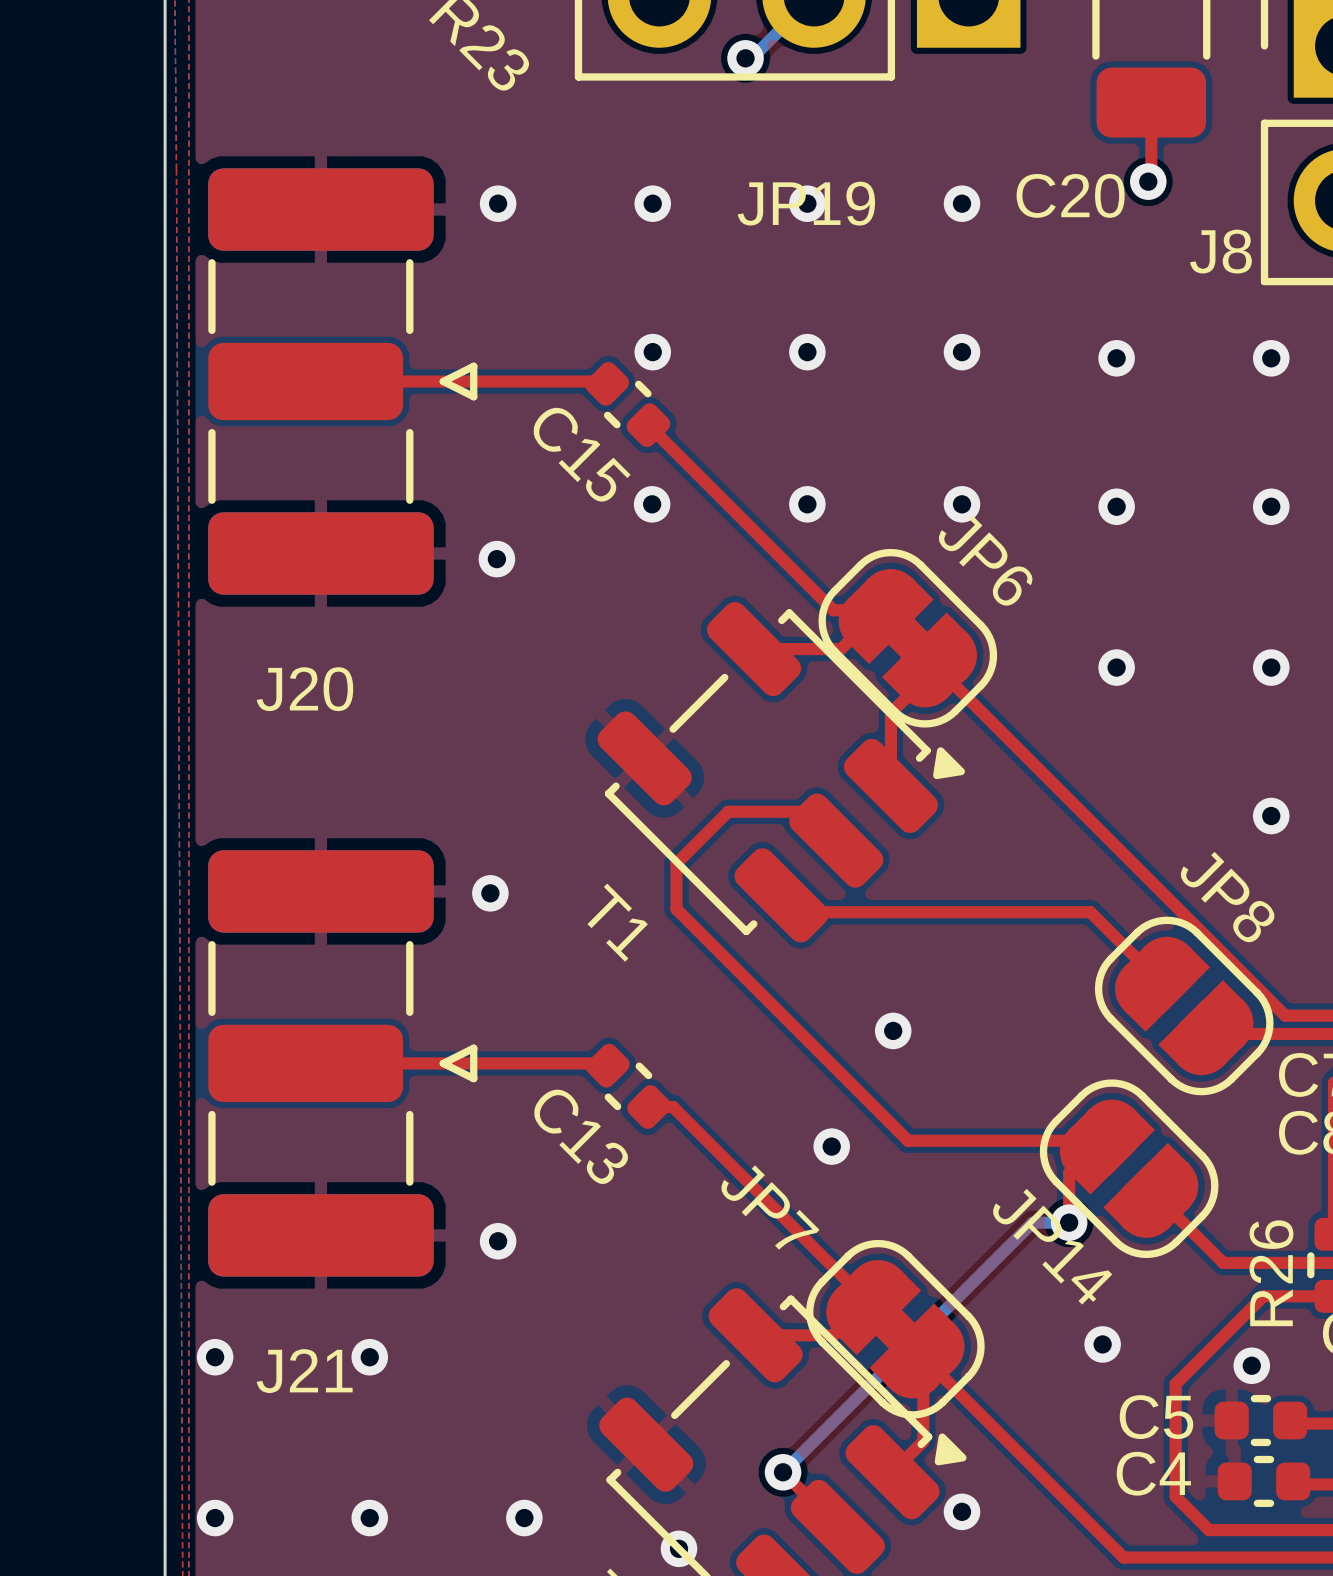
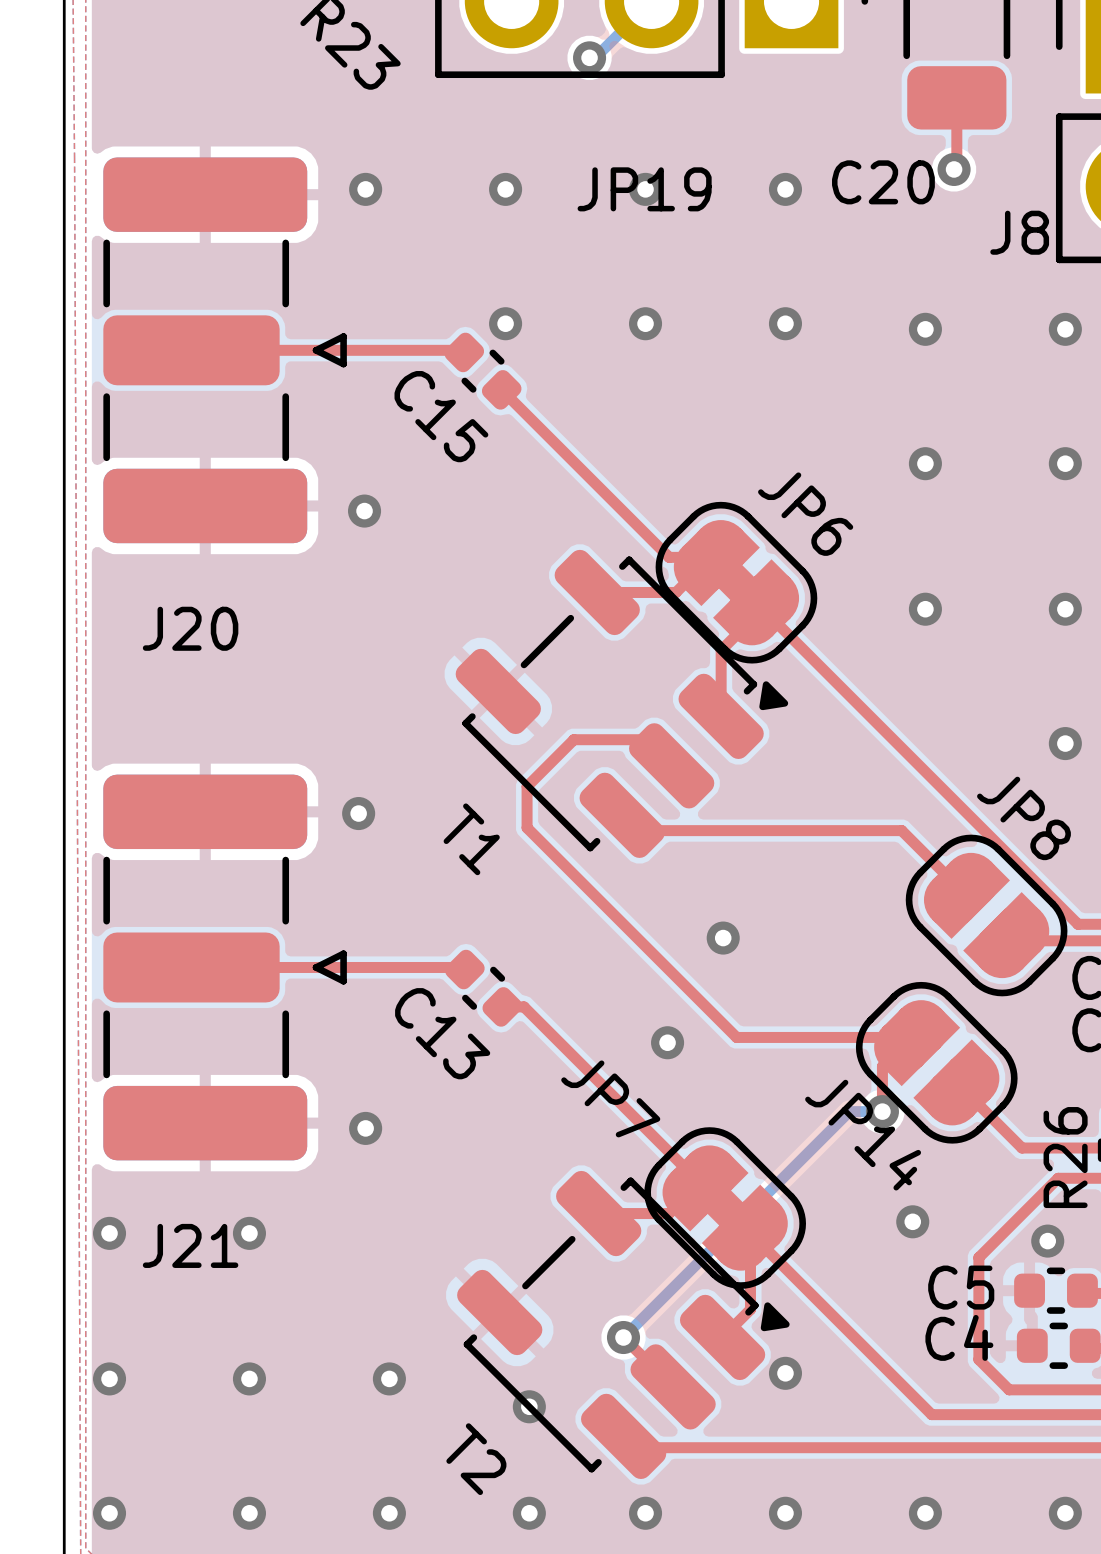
via: (652, 504) -> none
via: (807, 504) -> none
via: (962, 504) -> none

